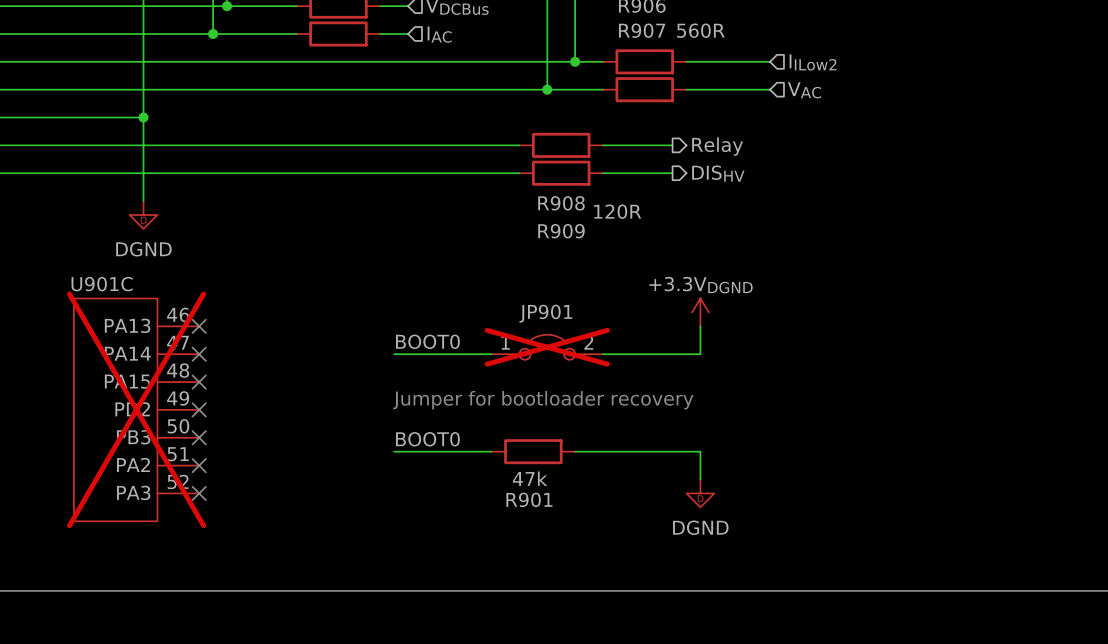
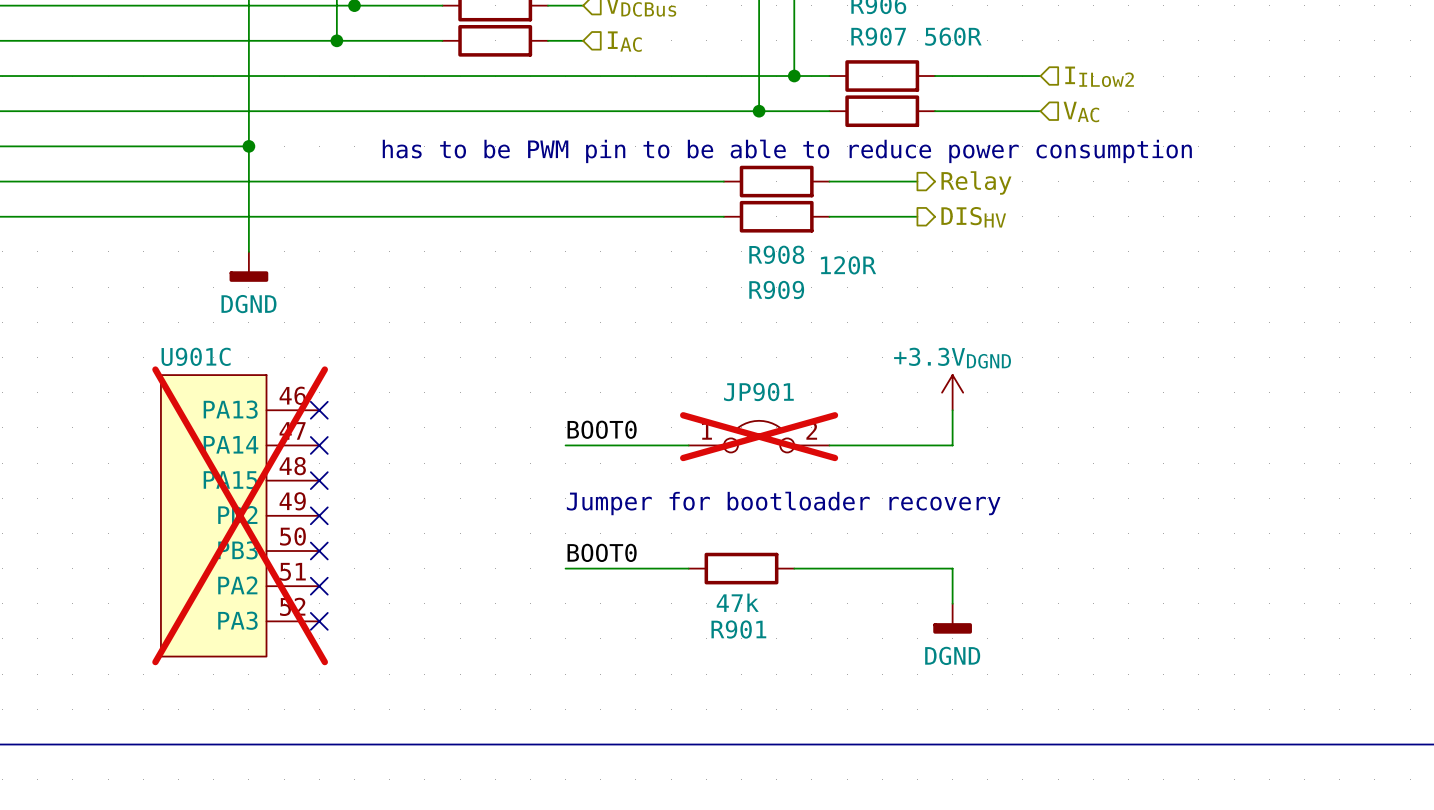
text: none -> has to be PWM pin to be able to reduce power consumption (787, 151)
power symbol shape: [129, 201, 158, 229] -> [229, 251, 269, 282]
power symbol shape: [686, 479, 715, 508] -> [933, 603, 972, 634]

